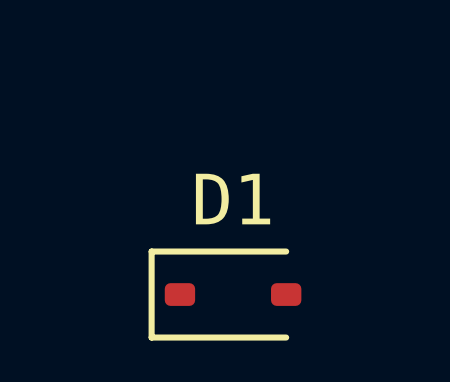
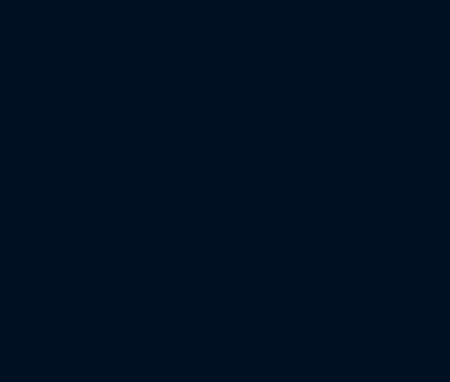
D1: (224, 294) -> none

